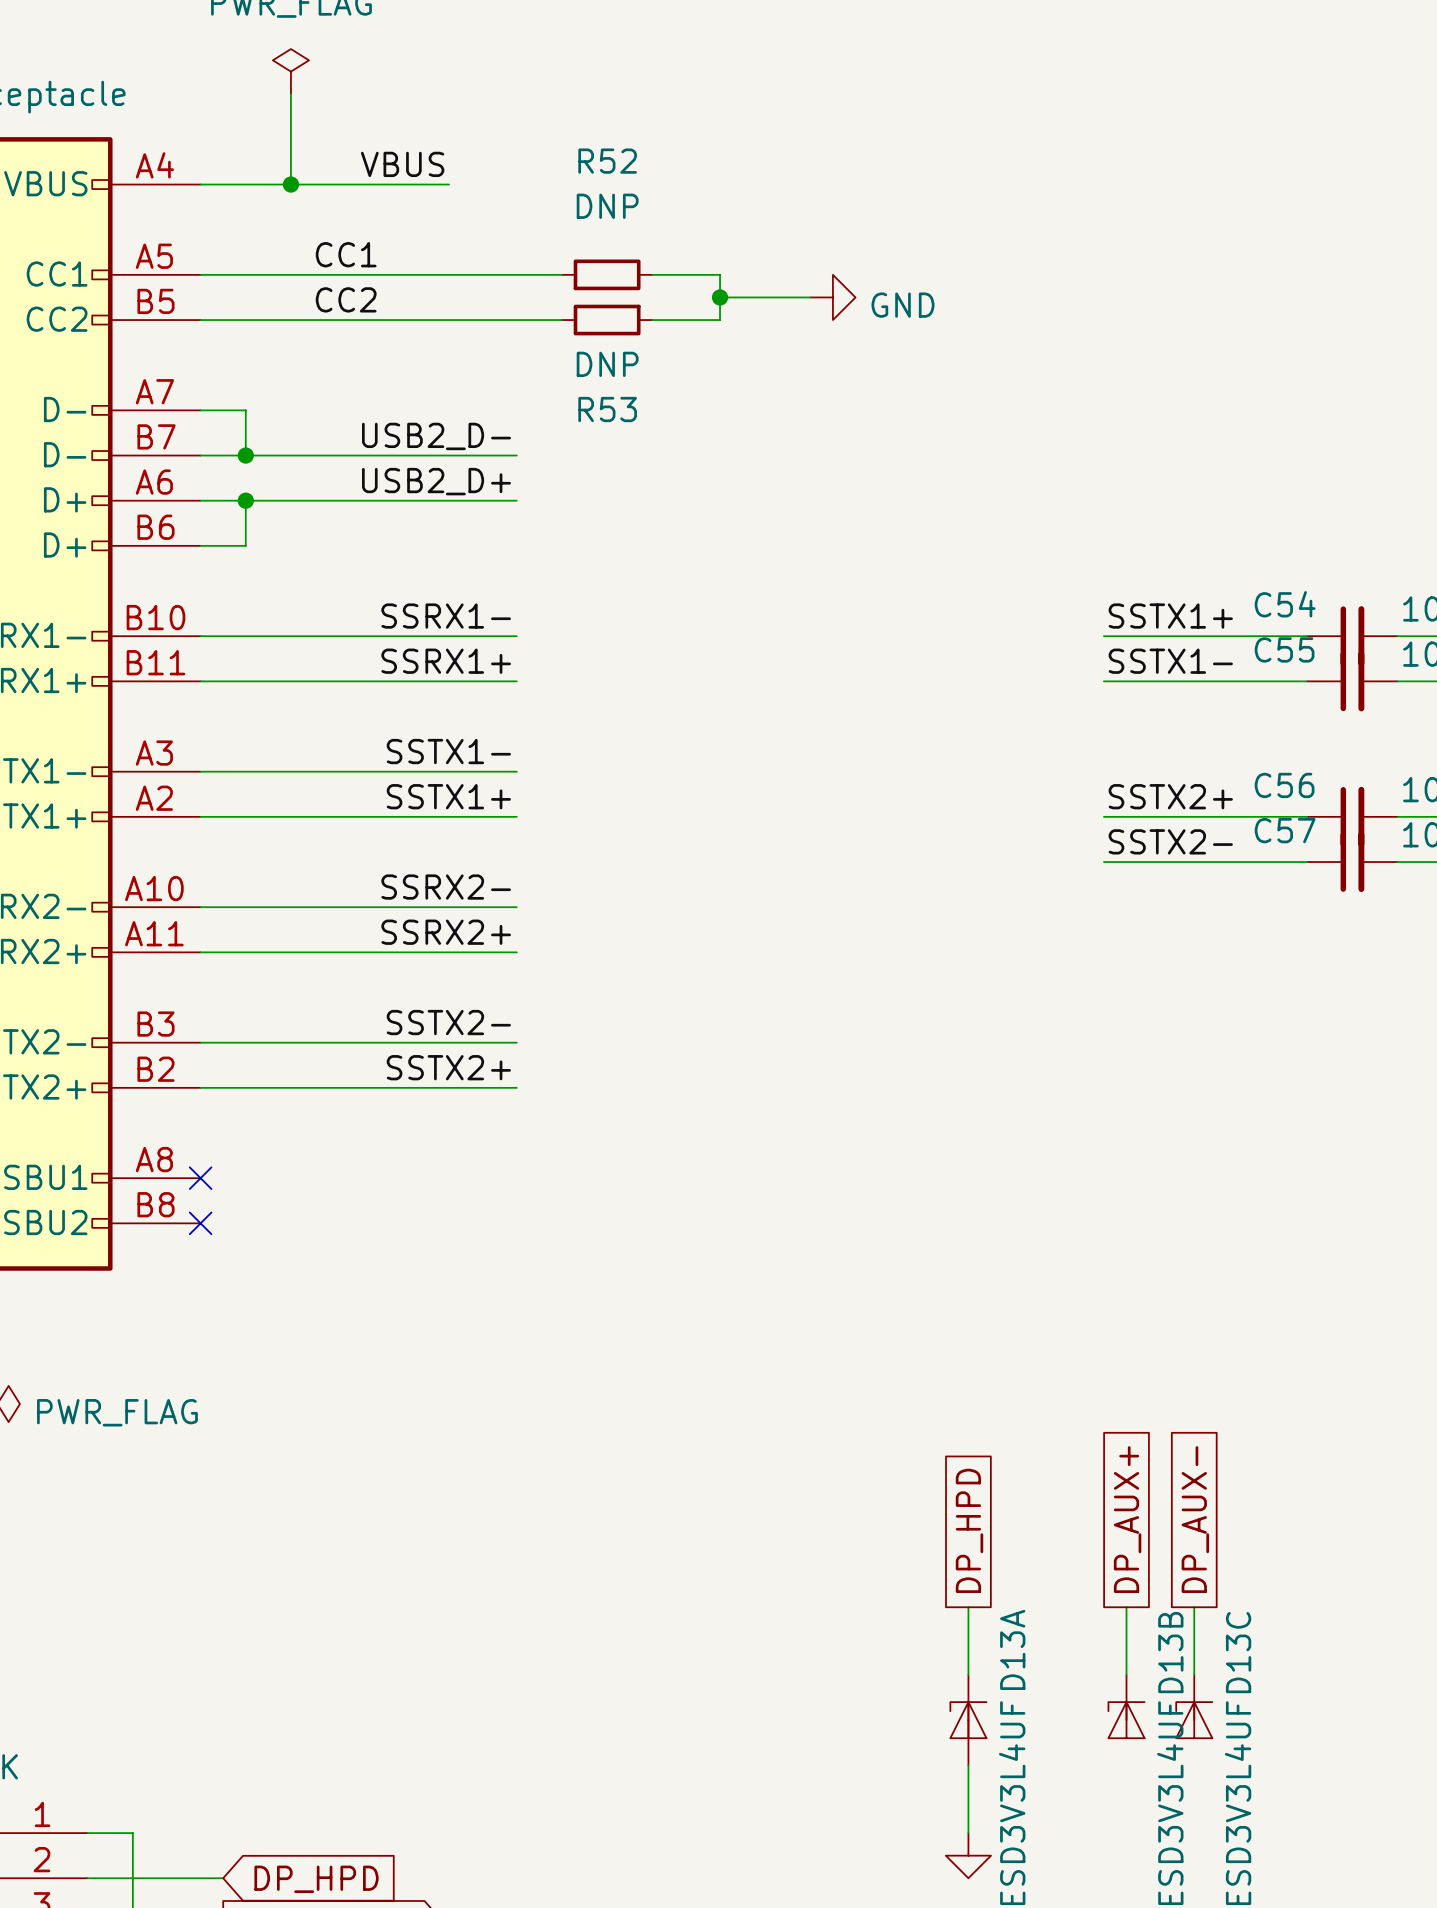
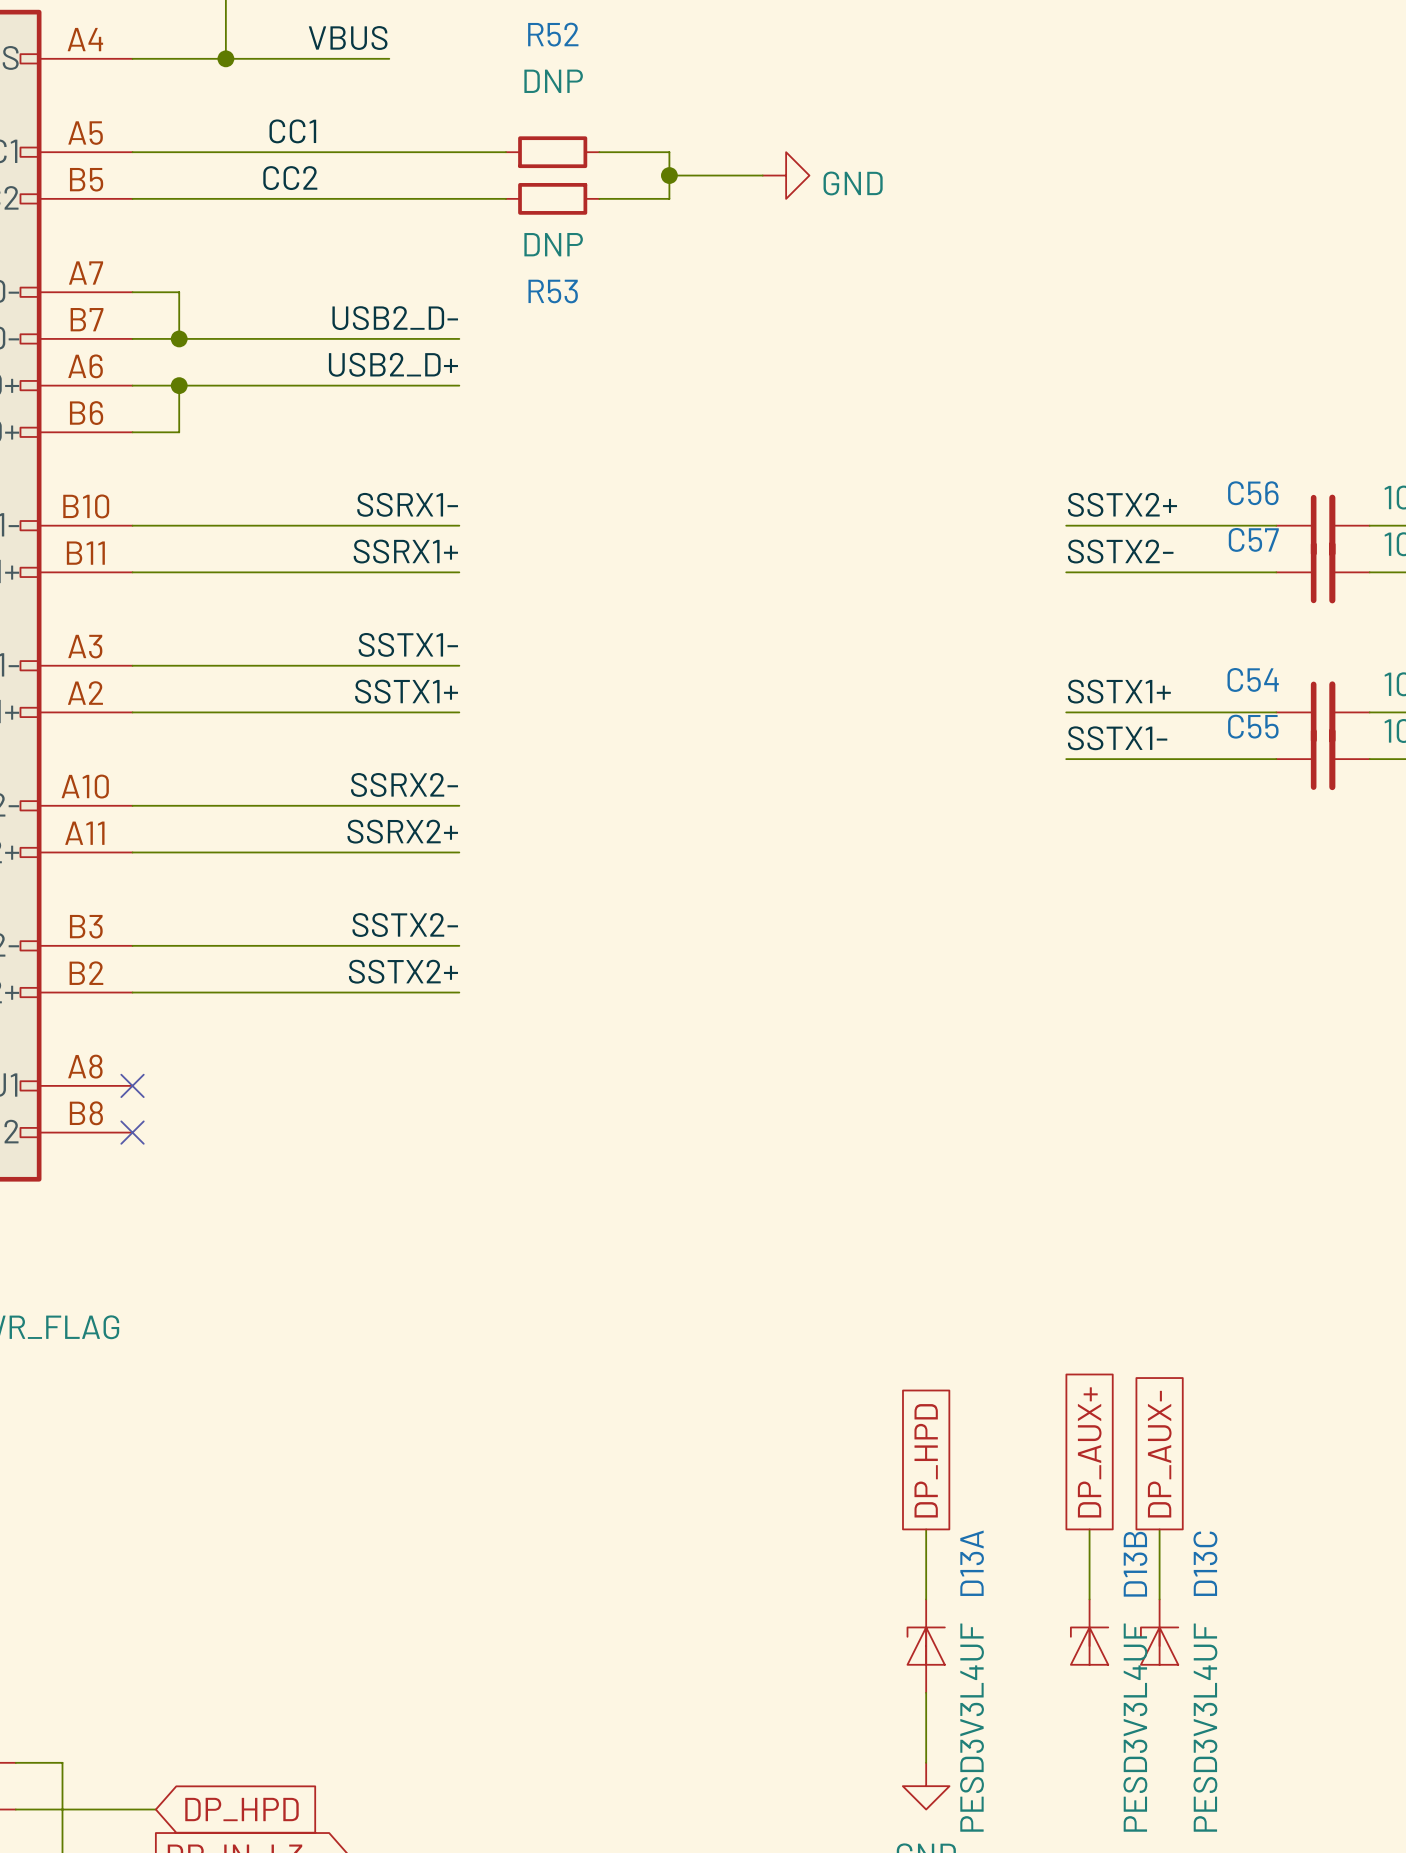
C54 name: C54 (1285, 604) -> C56 (1253, 493)
label: SSTX1+ (1170, 616) -> SSTX2+ (1122, 504)
C55 name: C55 (1284, 649) -> C57 (1253, 539)
label: SSTX1- (1170, 661) -> SSTX2- (1120, 551)
C56 name: C56 (1284, 785) -> C54 (1253, 679)
label: SSTX2+ (1170, 796) -> SSTX1+ (1119, 691)
C57 name: C57 (1285, 830) -> C55 (1253, 726)
label: SSTX2- (1170, 841) -> SSTX1- (1117, 738)

